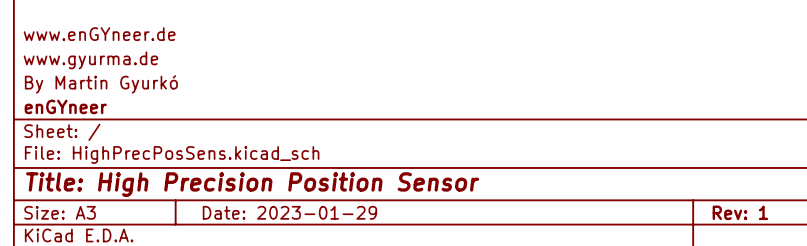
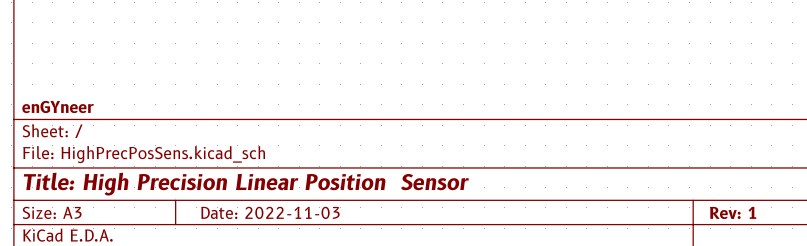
title block: www.enGYneer.de (99, 34) -> none
title block: www.gyurma.de (90, 60) -> none
title block: By Martin Gyurkó (101, 84) -> none
title block: Title: High Precision Position Sensor (252, 184) -> Title: High Precision Linear Position Sensor (246, 184)
title block: Date: 2023-01-29 (289, 212) -> Date: 2022-11-03 (270, 212)

